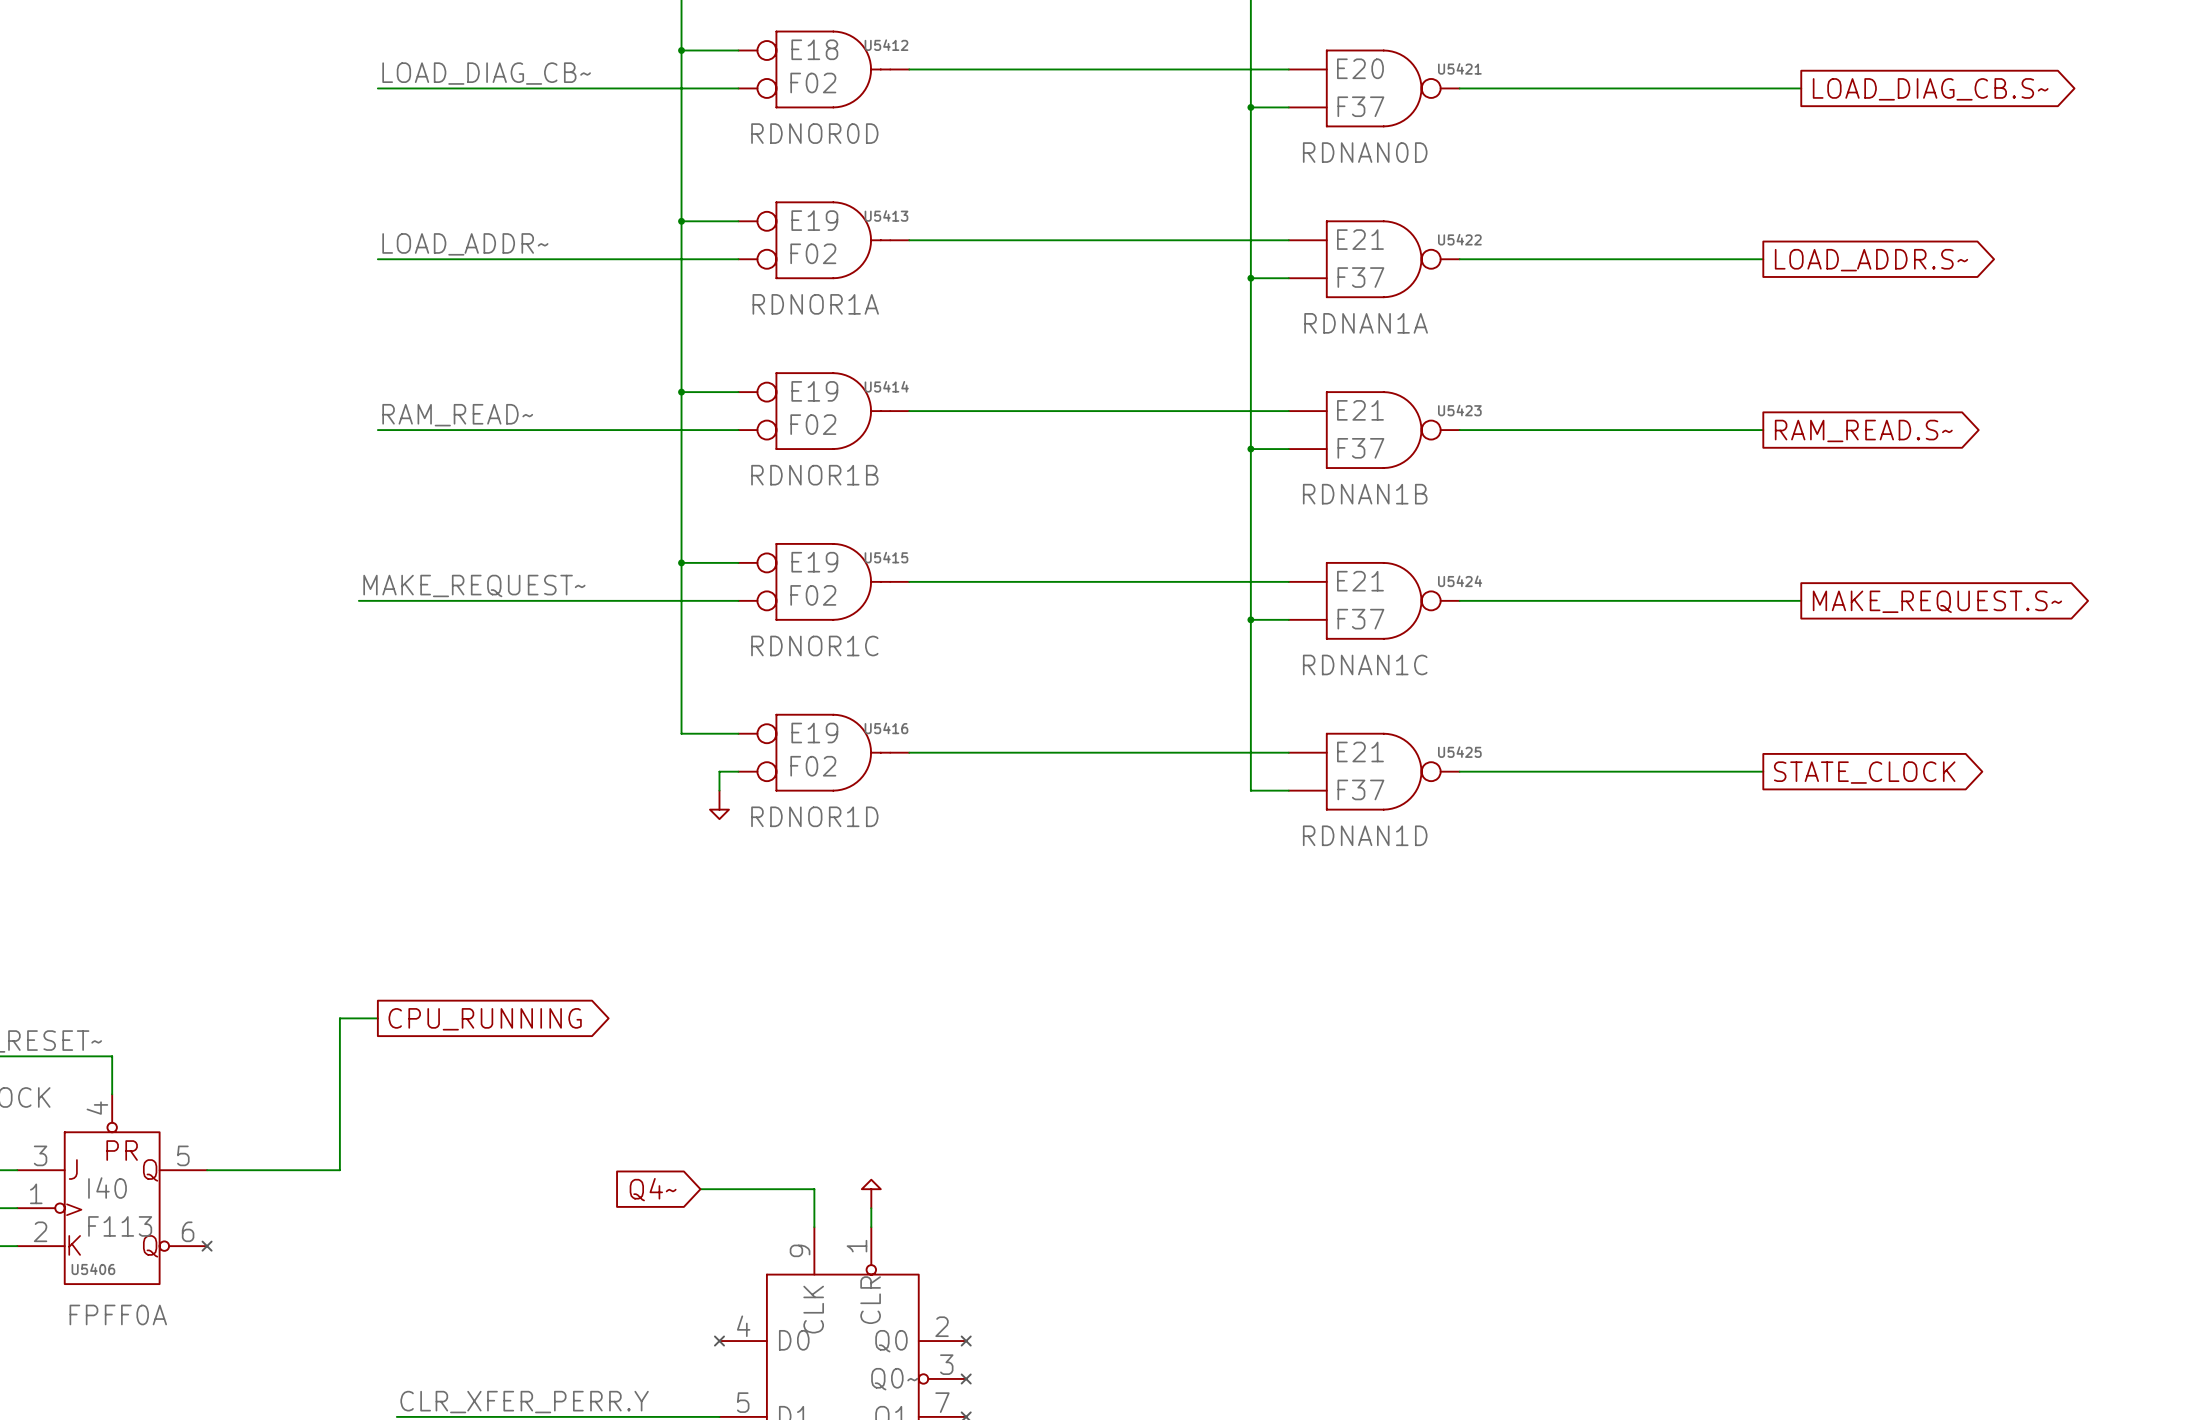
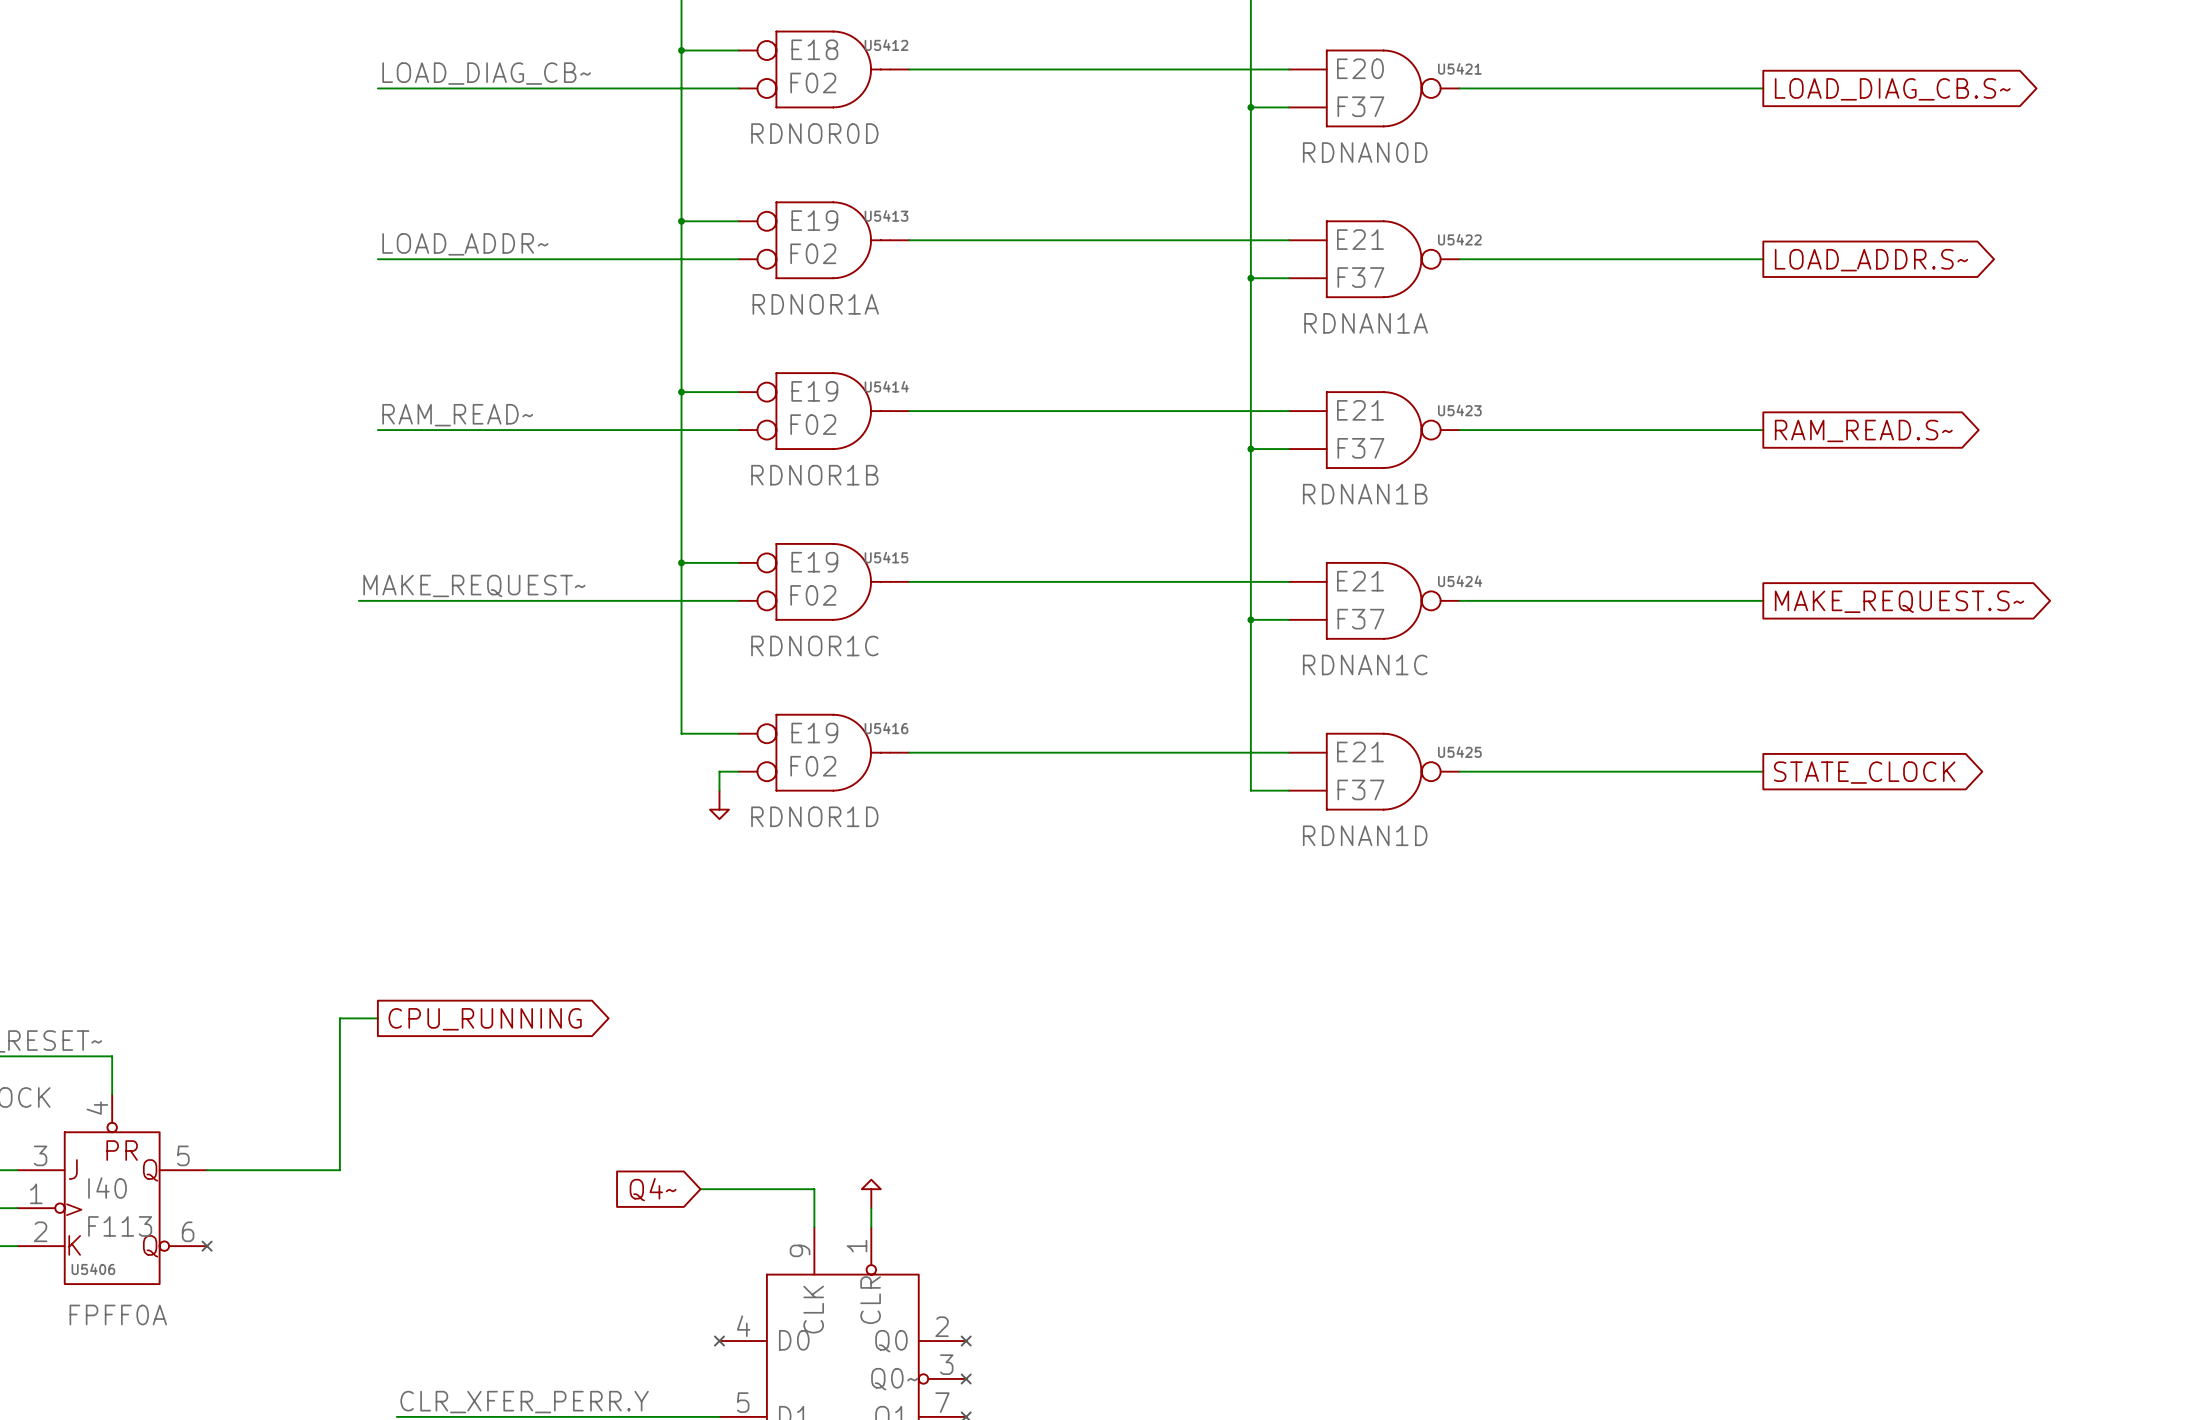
wire: (1763, 88) (1801, 88) -> none
global label position: LOAD_DIAG_CB.S~ (1930, 89) -> LOAD_DIAG_CB.S~ (1892, 89)
wire: (1763, 600) (1801, 600) -> none
global label position: MAKE_REQUEST.S~ (1937, 601) -> MAKE_REQUEST.S~ (1899, 601)

